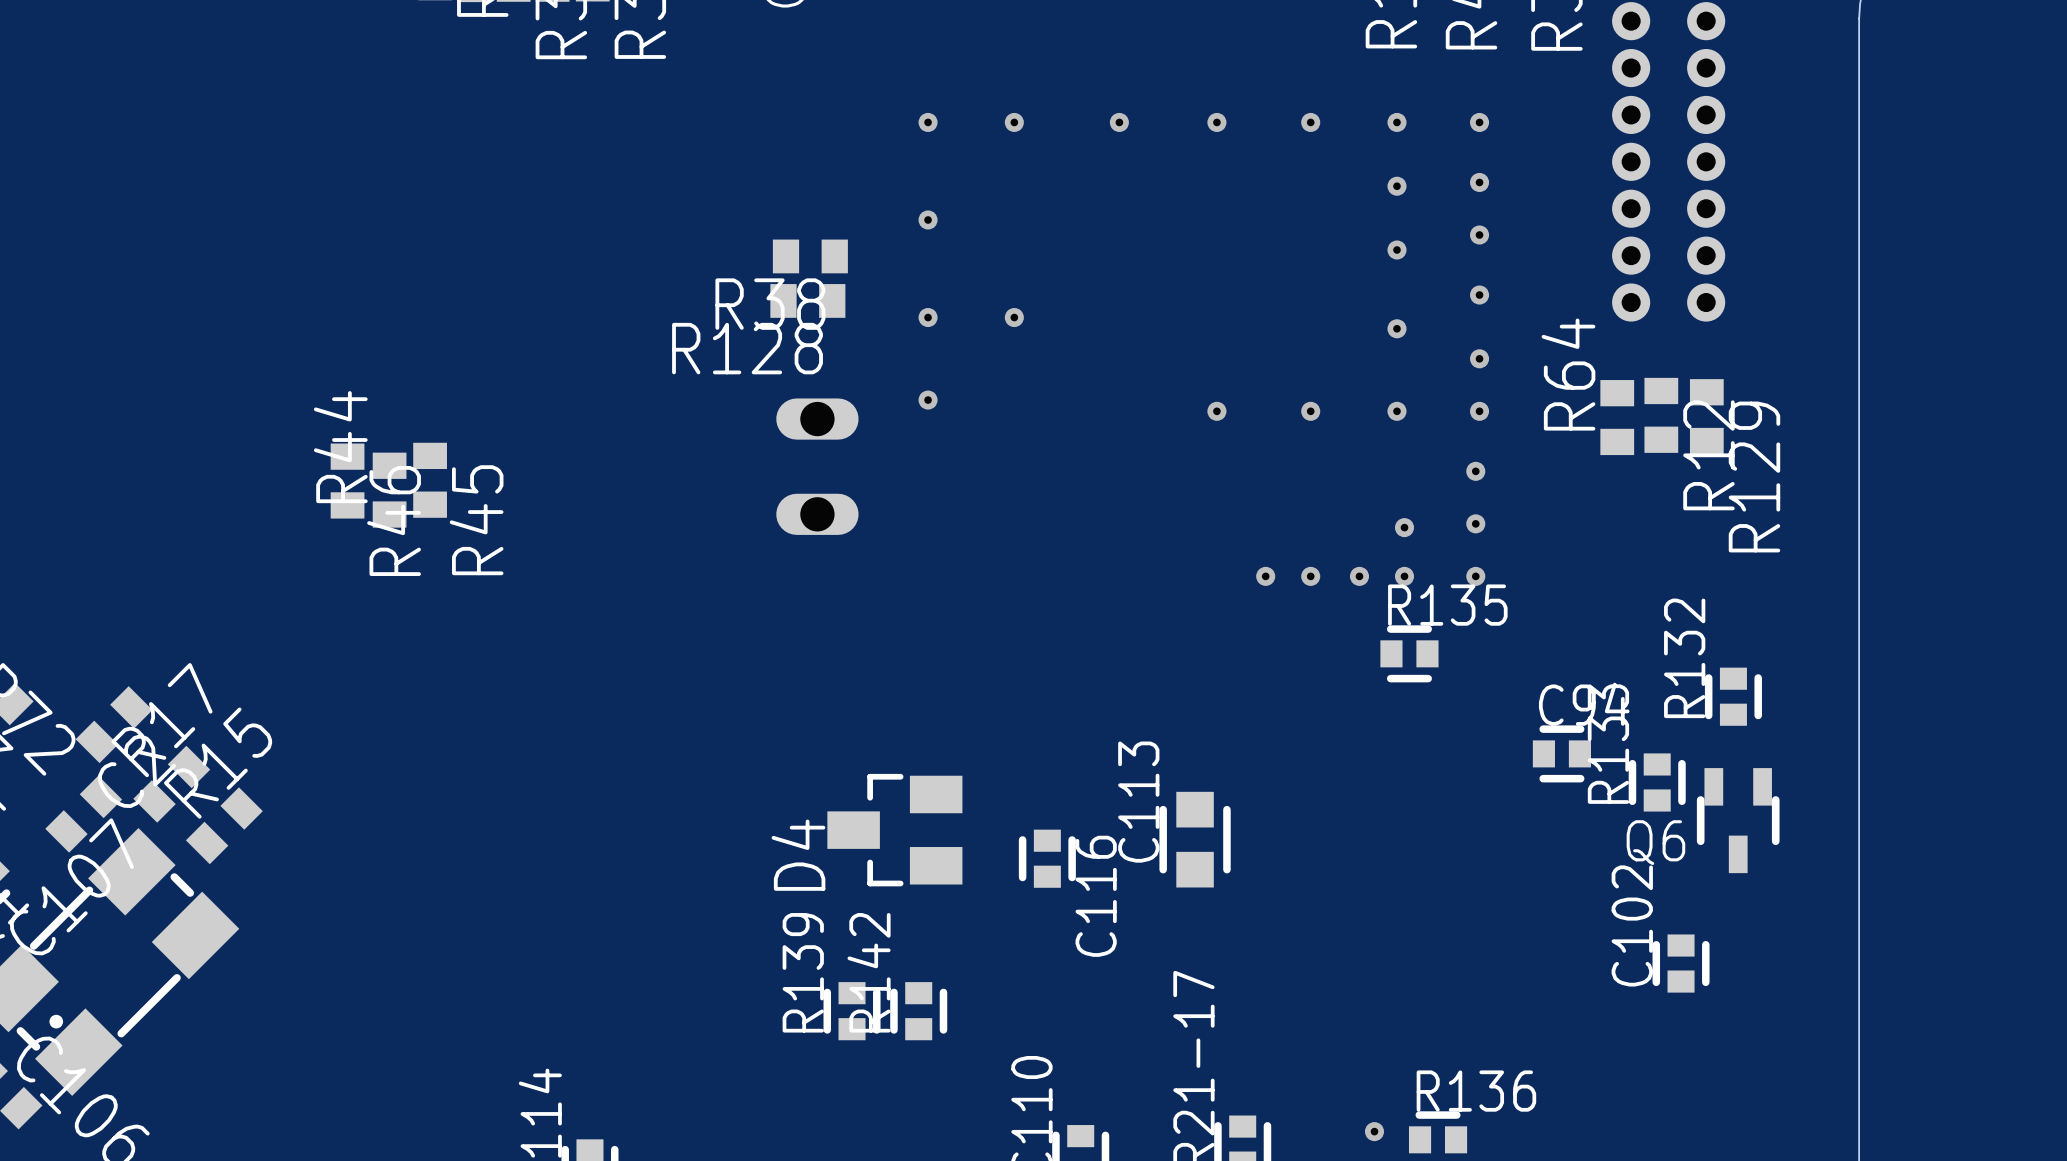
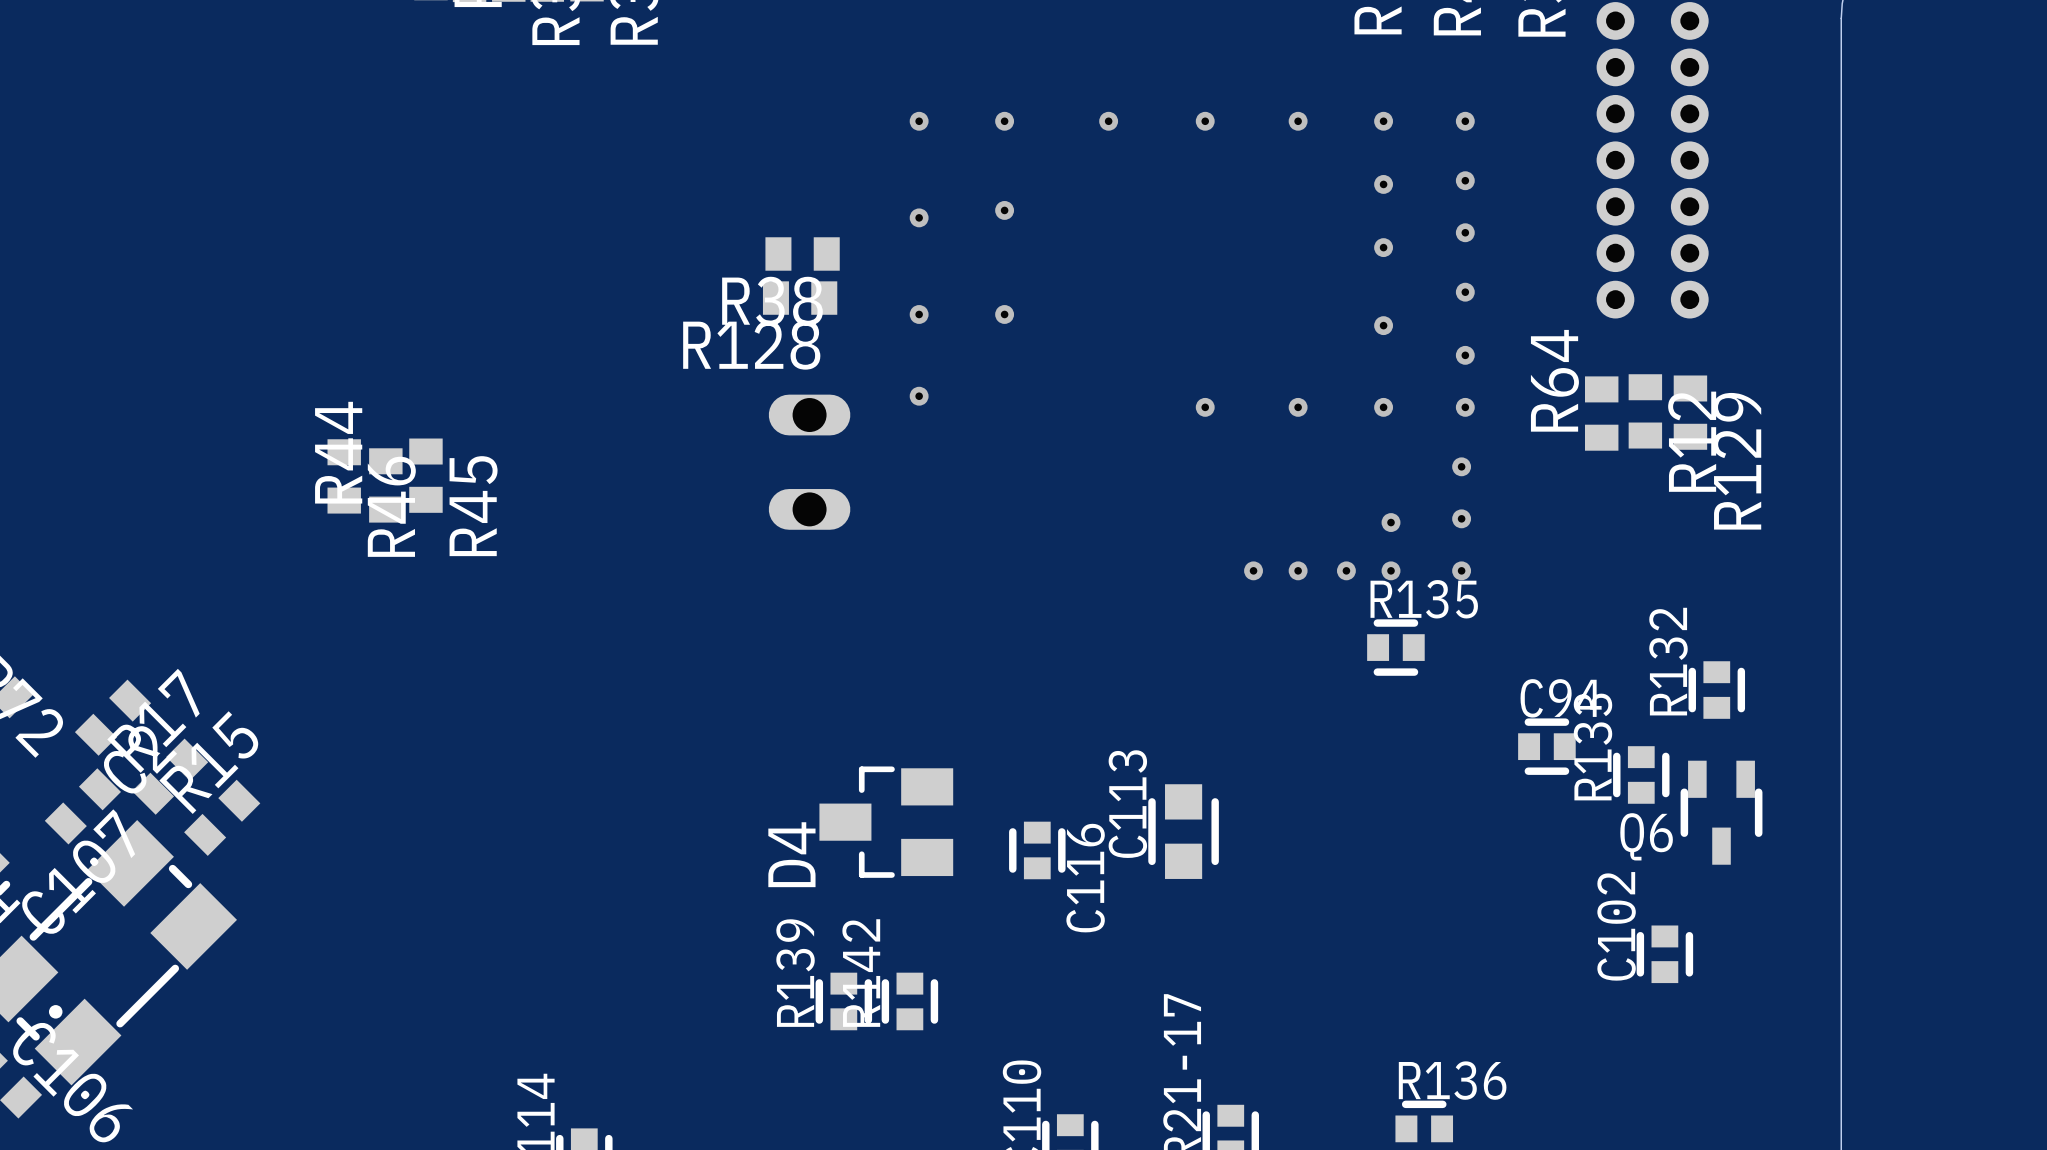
via: none -> (1004, 210)
via: (1374, 1131) -> none

